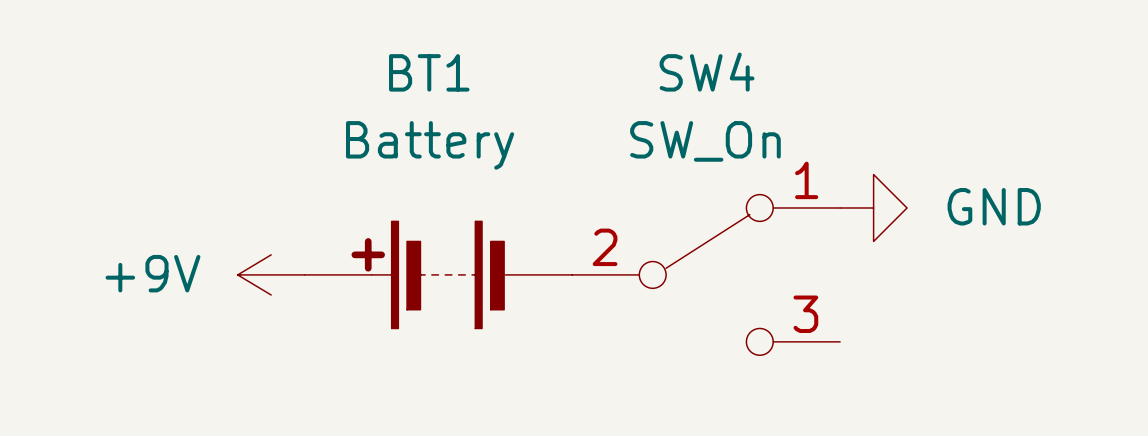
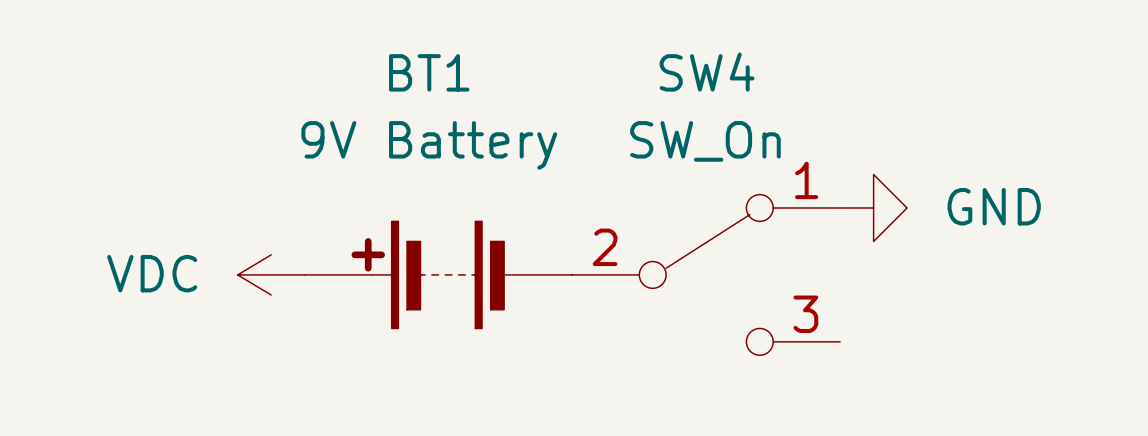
BT1 value: Battery (430, 145) -> 9V Battery (429, 145)
power symbol: +9V (271, 274) -> VDC (271, 274)

